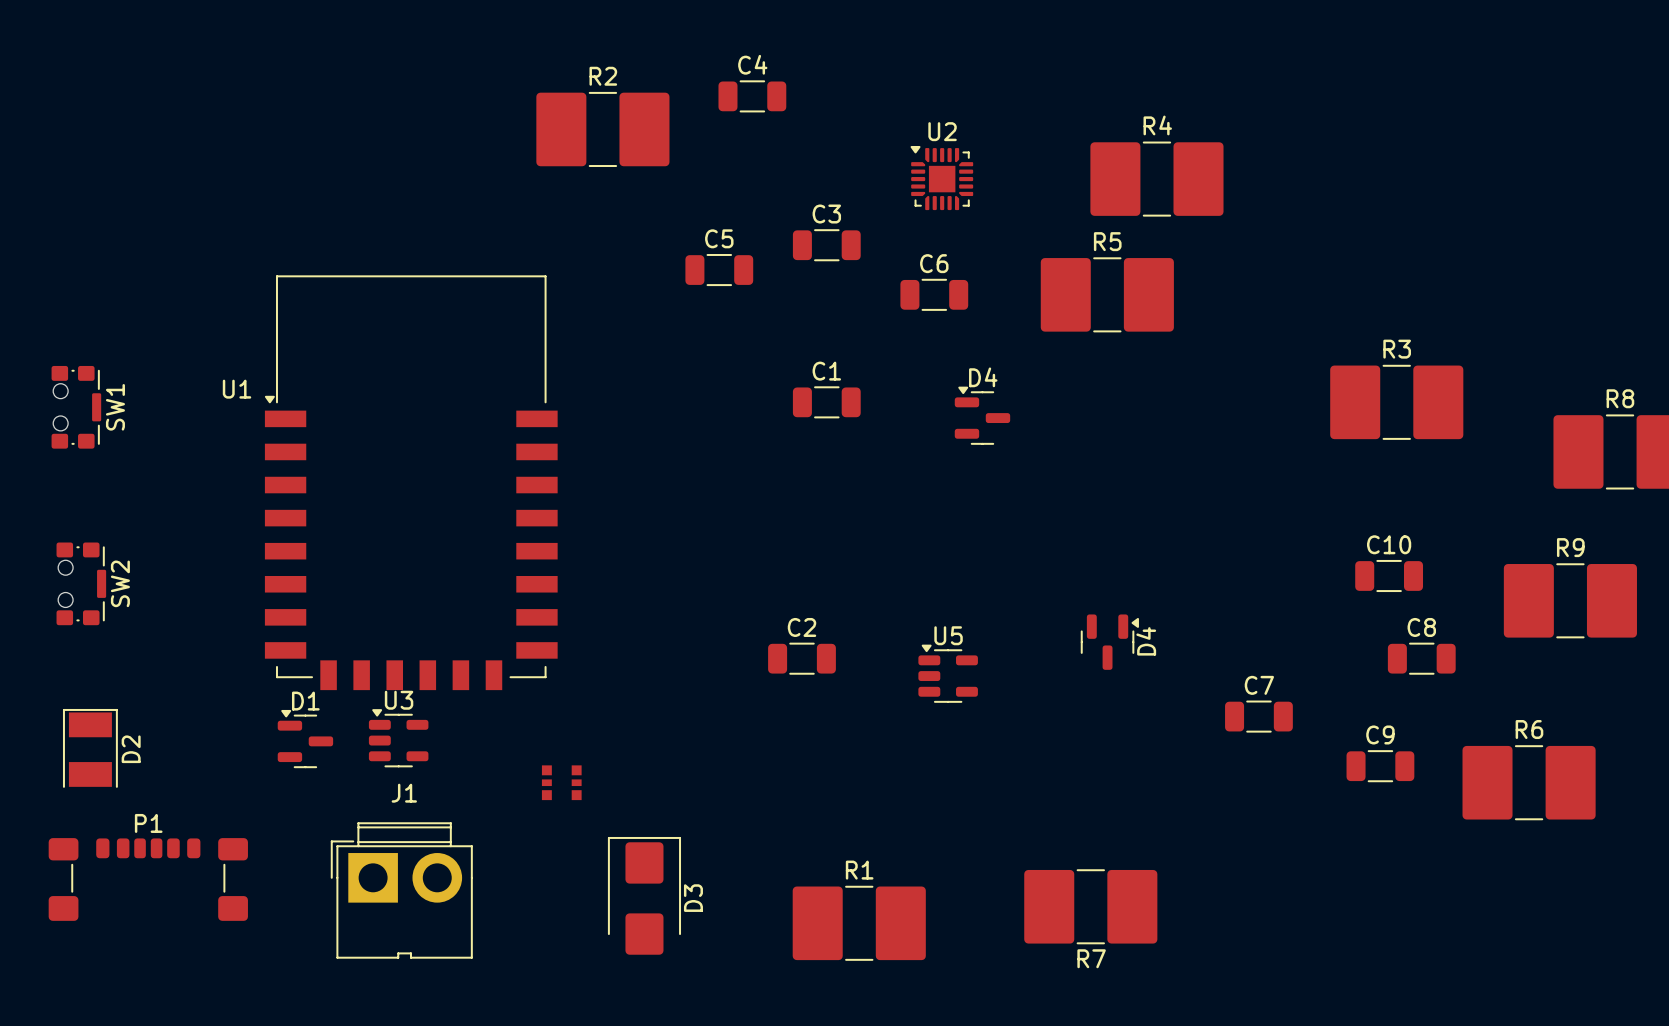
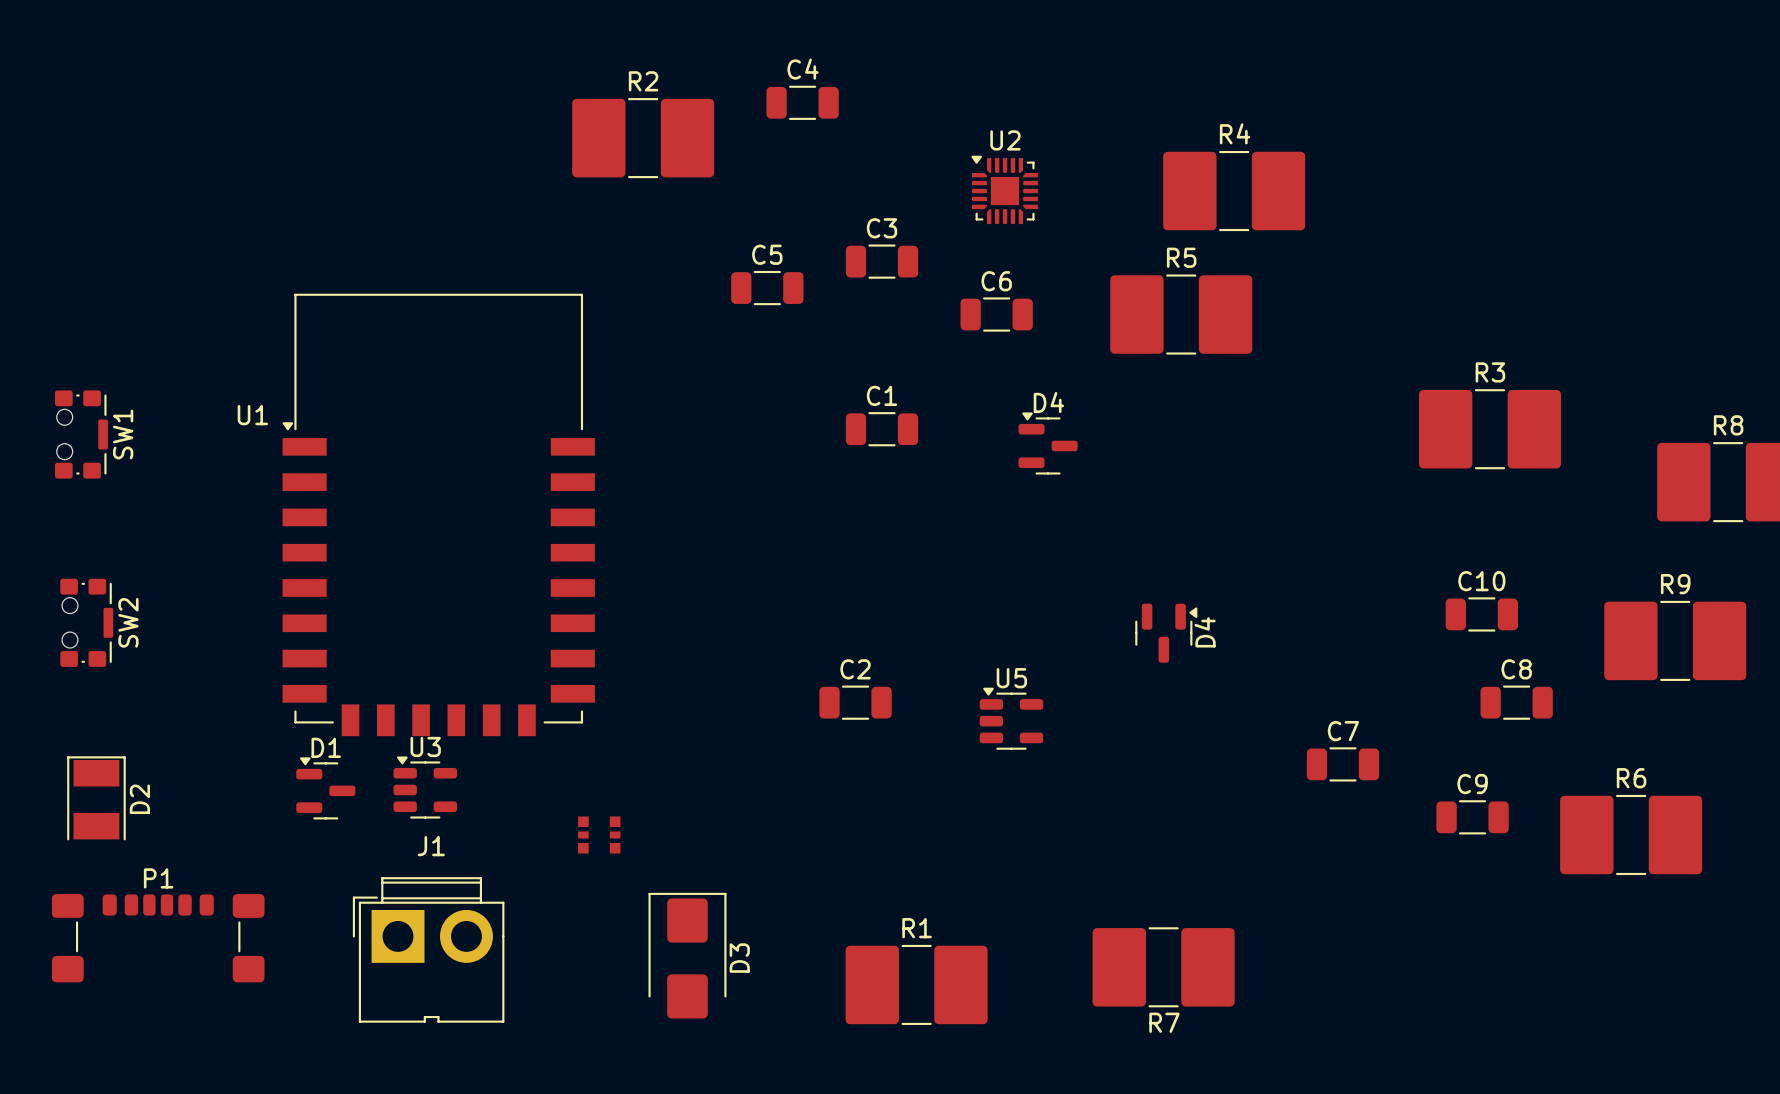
D4 position: (1109, 642) -> (1166, 633)

